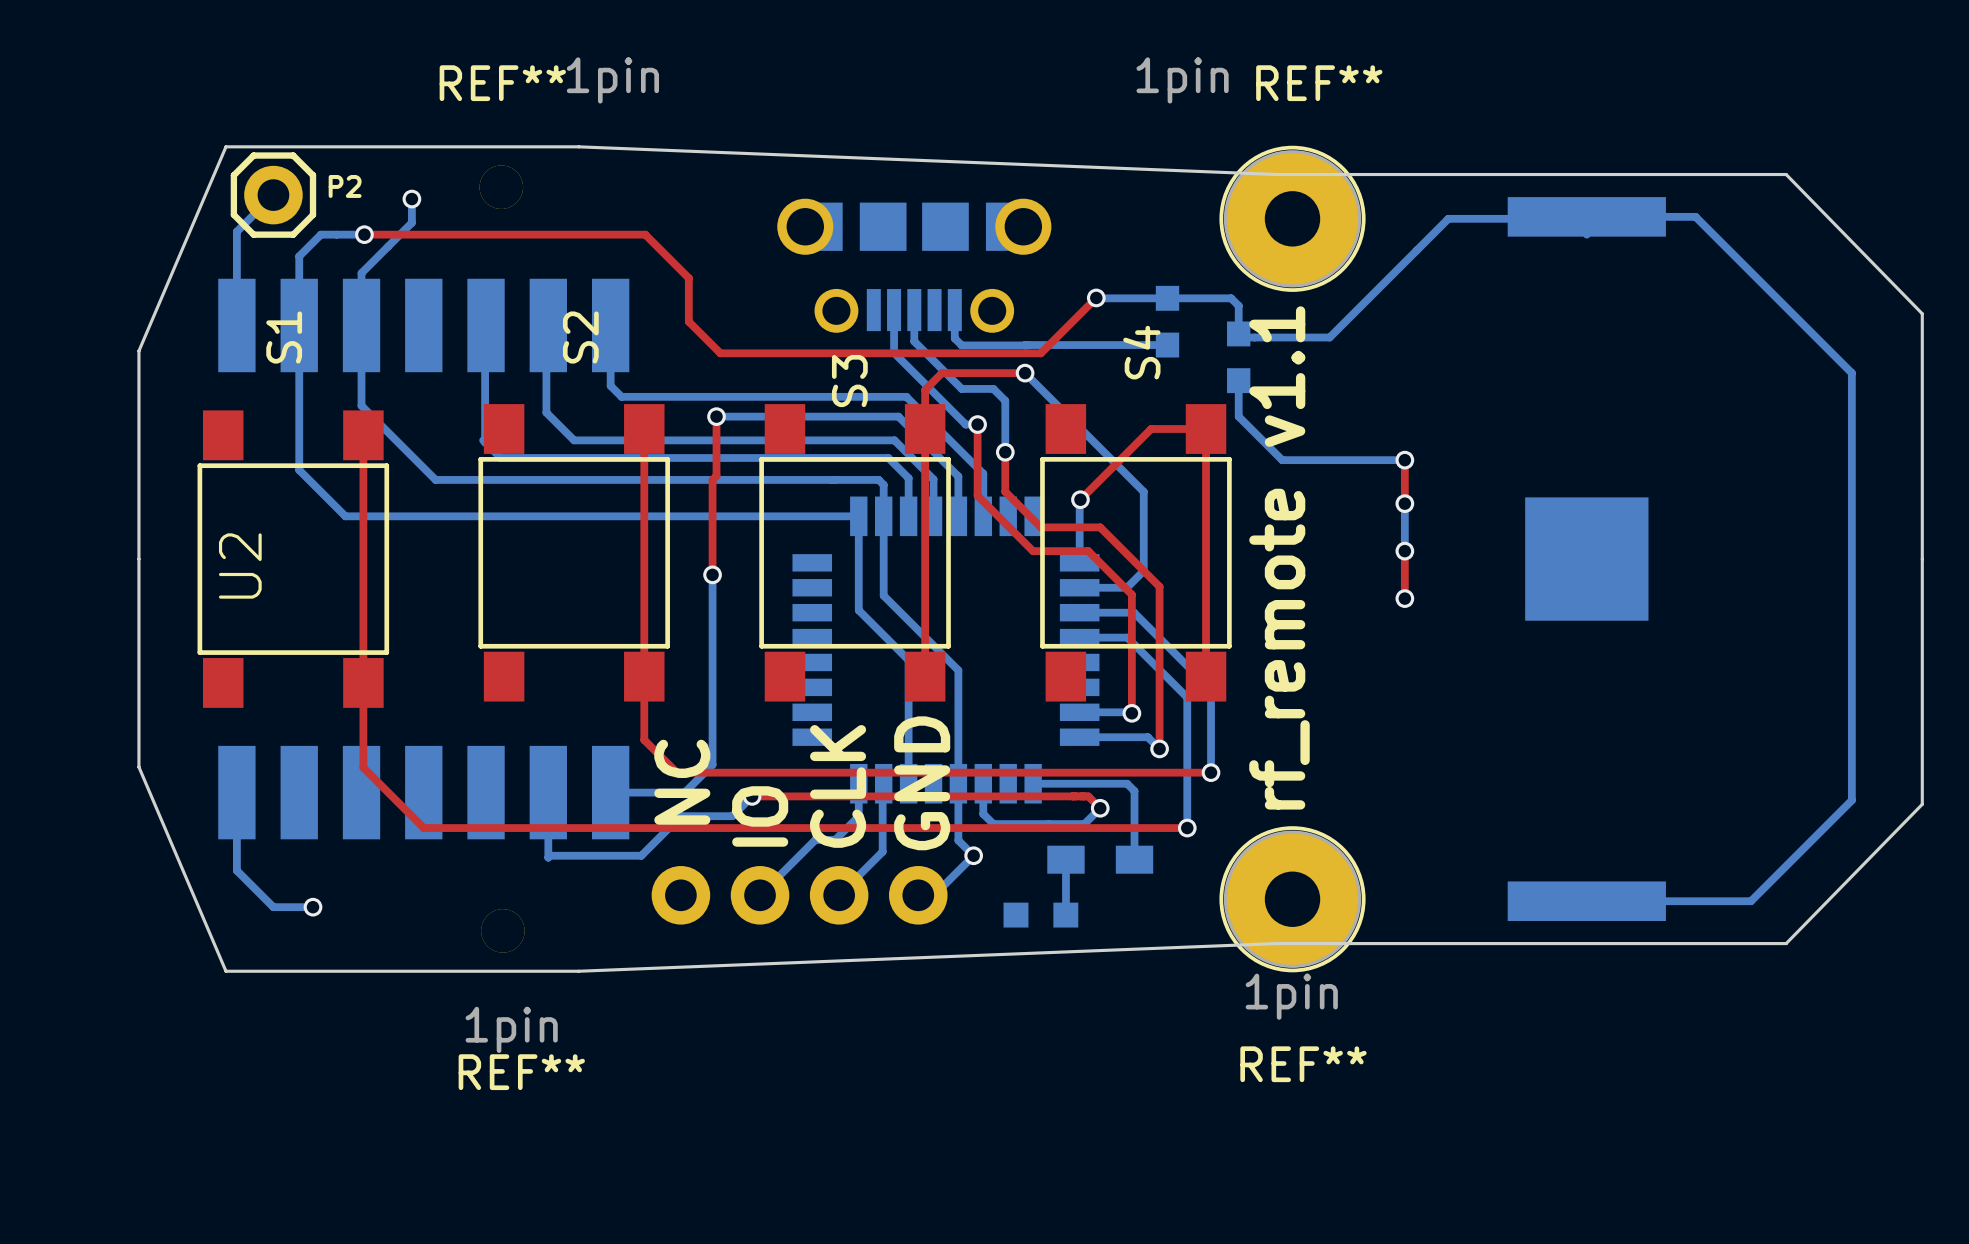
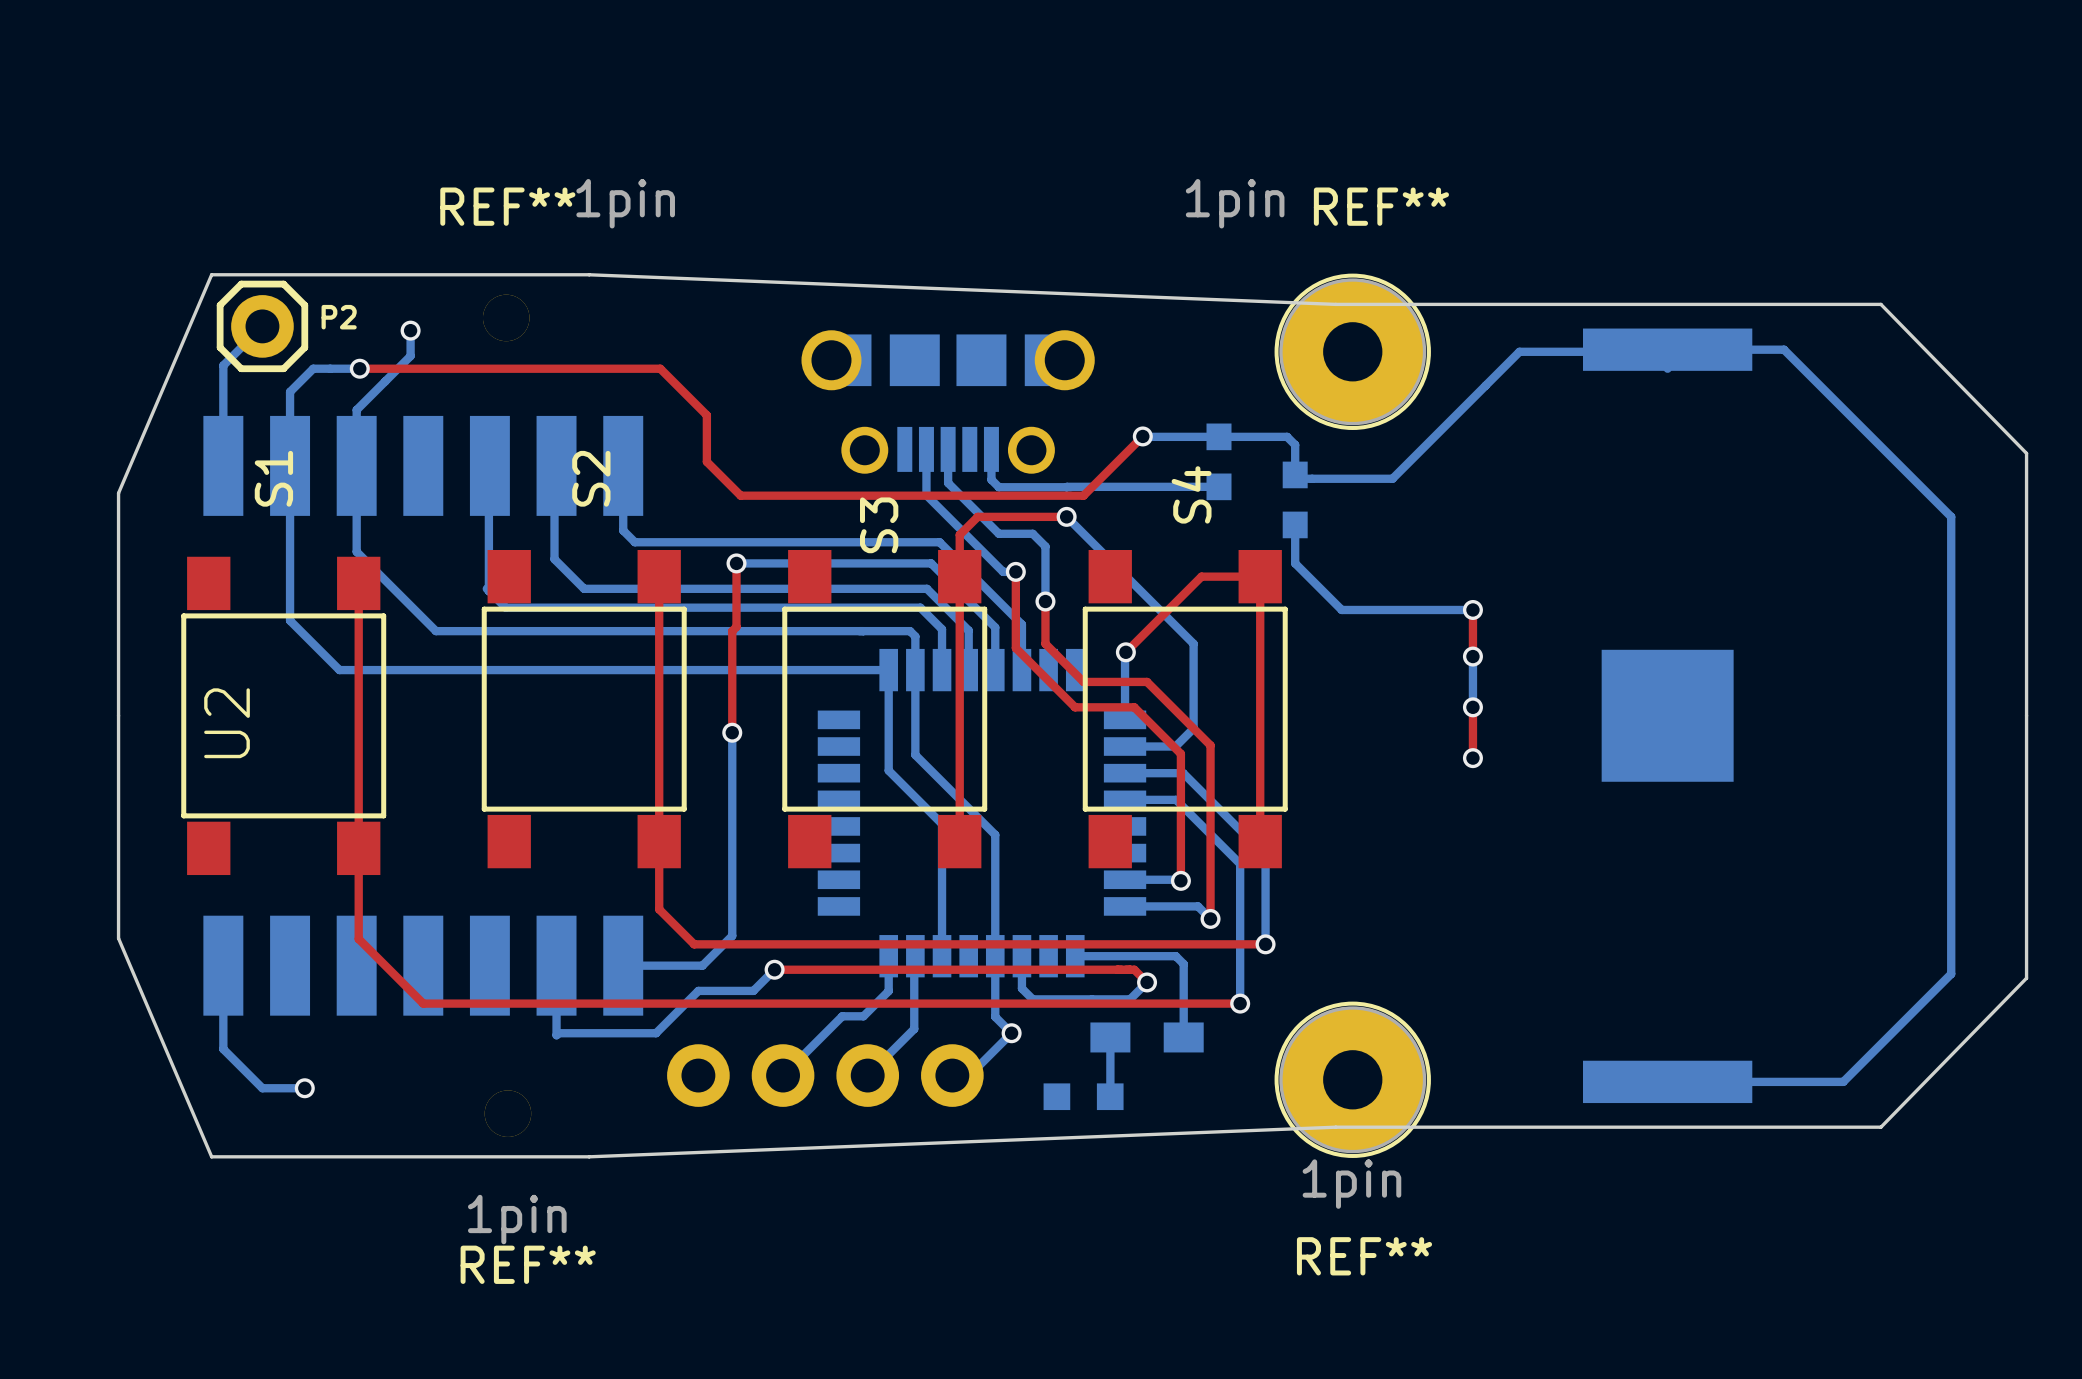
text: rf_remote v1.1 (1279, 557) -> none
text: NC (682, 782) -> none
text: GND (922, 783) -> none
text: CLK (838, 786) -> none
text: IO (760, 816) -> none

